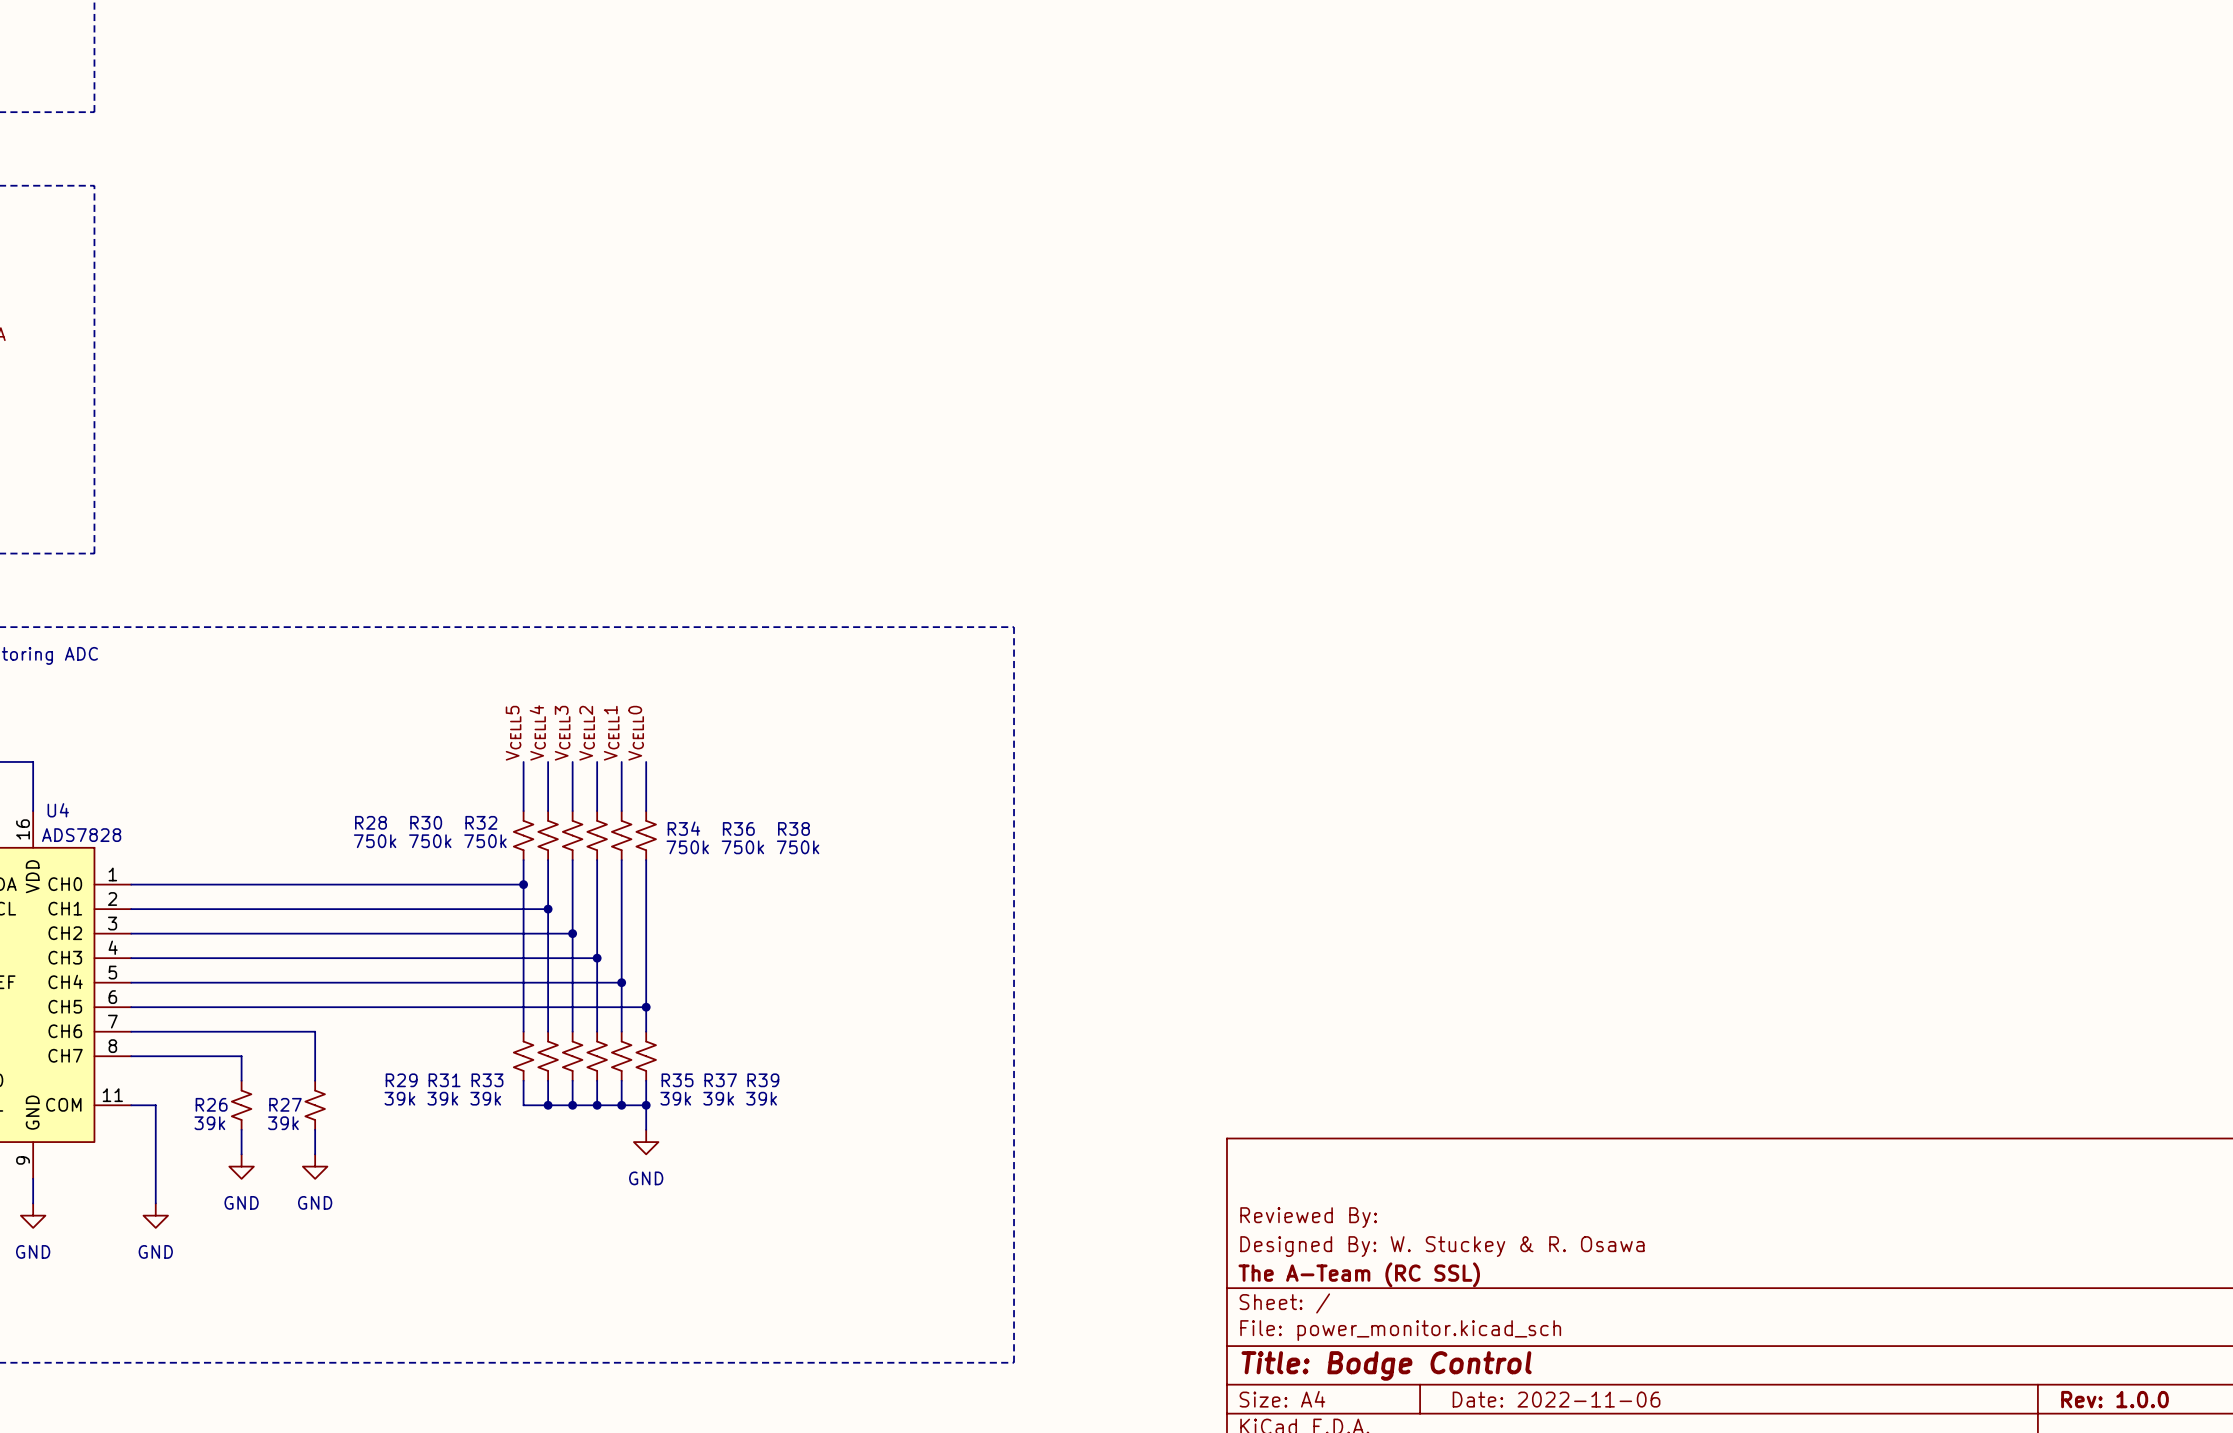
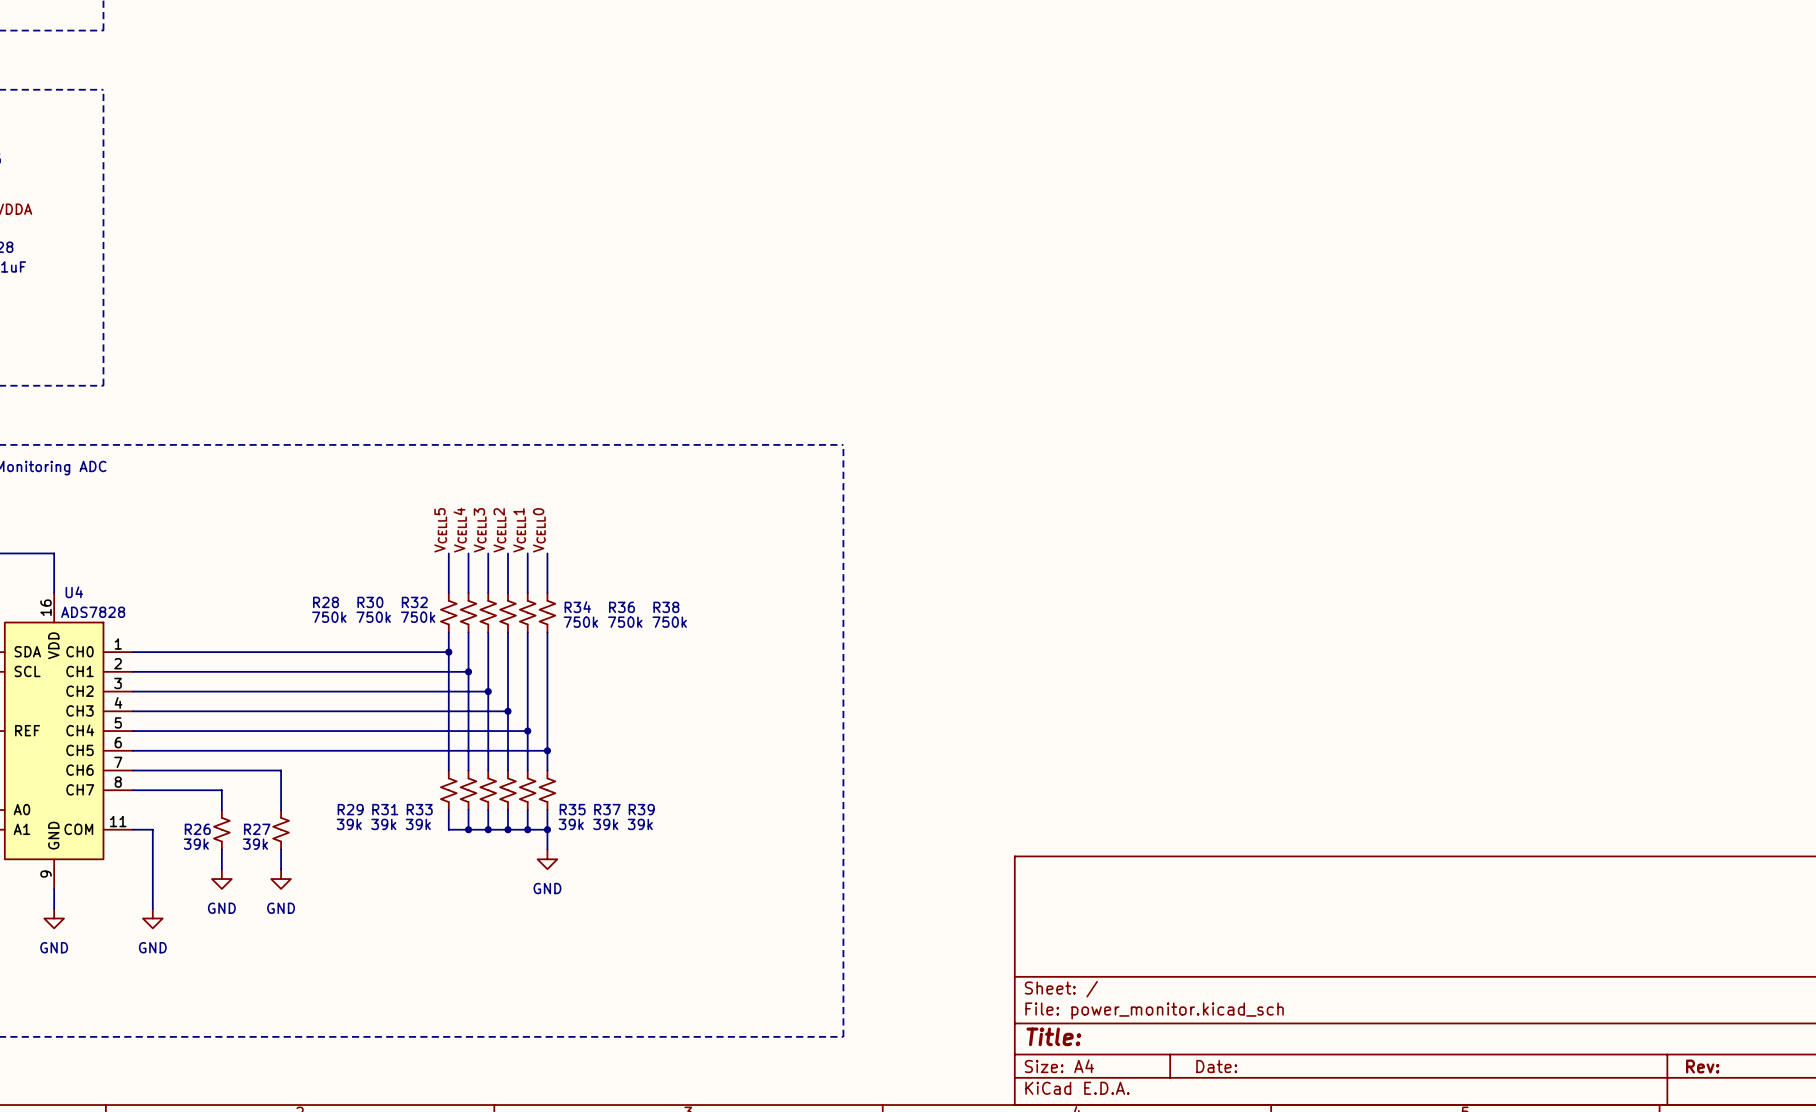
title block: Reviewed By: (1308, 1217) -> none
title block: Designed By: W. Stuckey & R. Osawa (1442, 1246) -> none
title block: The A-Team (RC SSL) (1359, 1274) -> none
title block: Title: Bodge Control (1386, 1365) -> Title: (1053, 1036)
title block: Date: 2022-11-06 (1556, 1399) -> Date: (1216, 1066)
title block: Rev: 1.0.0 (2115, 1399) -> Rev: (1702, 1066)

